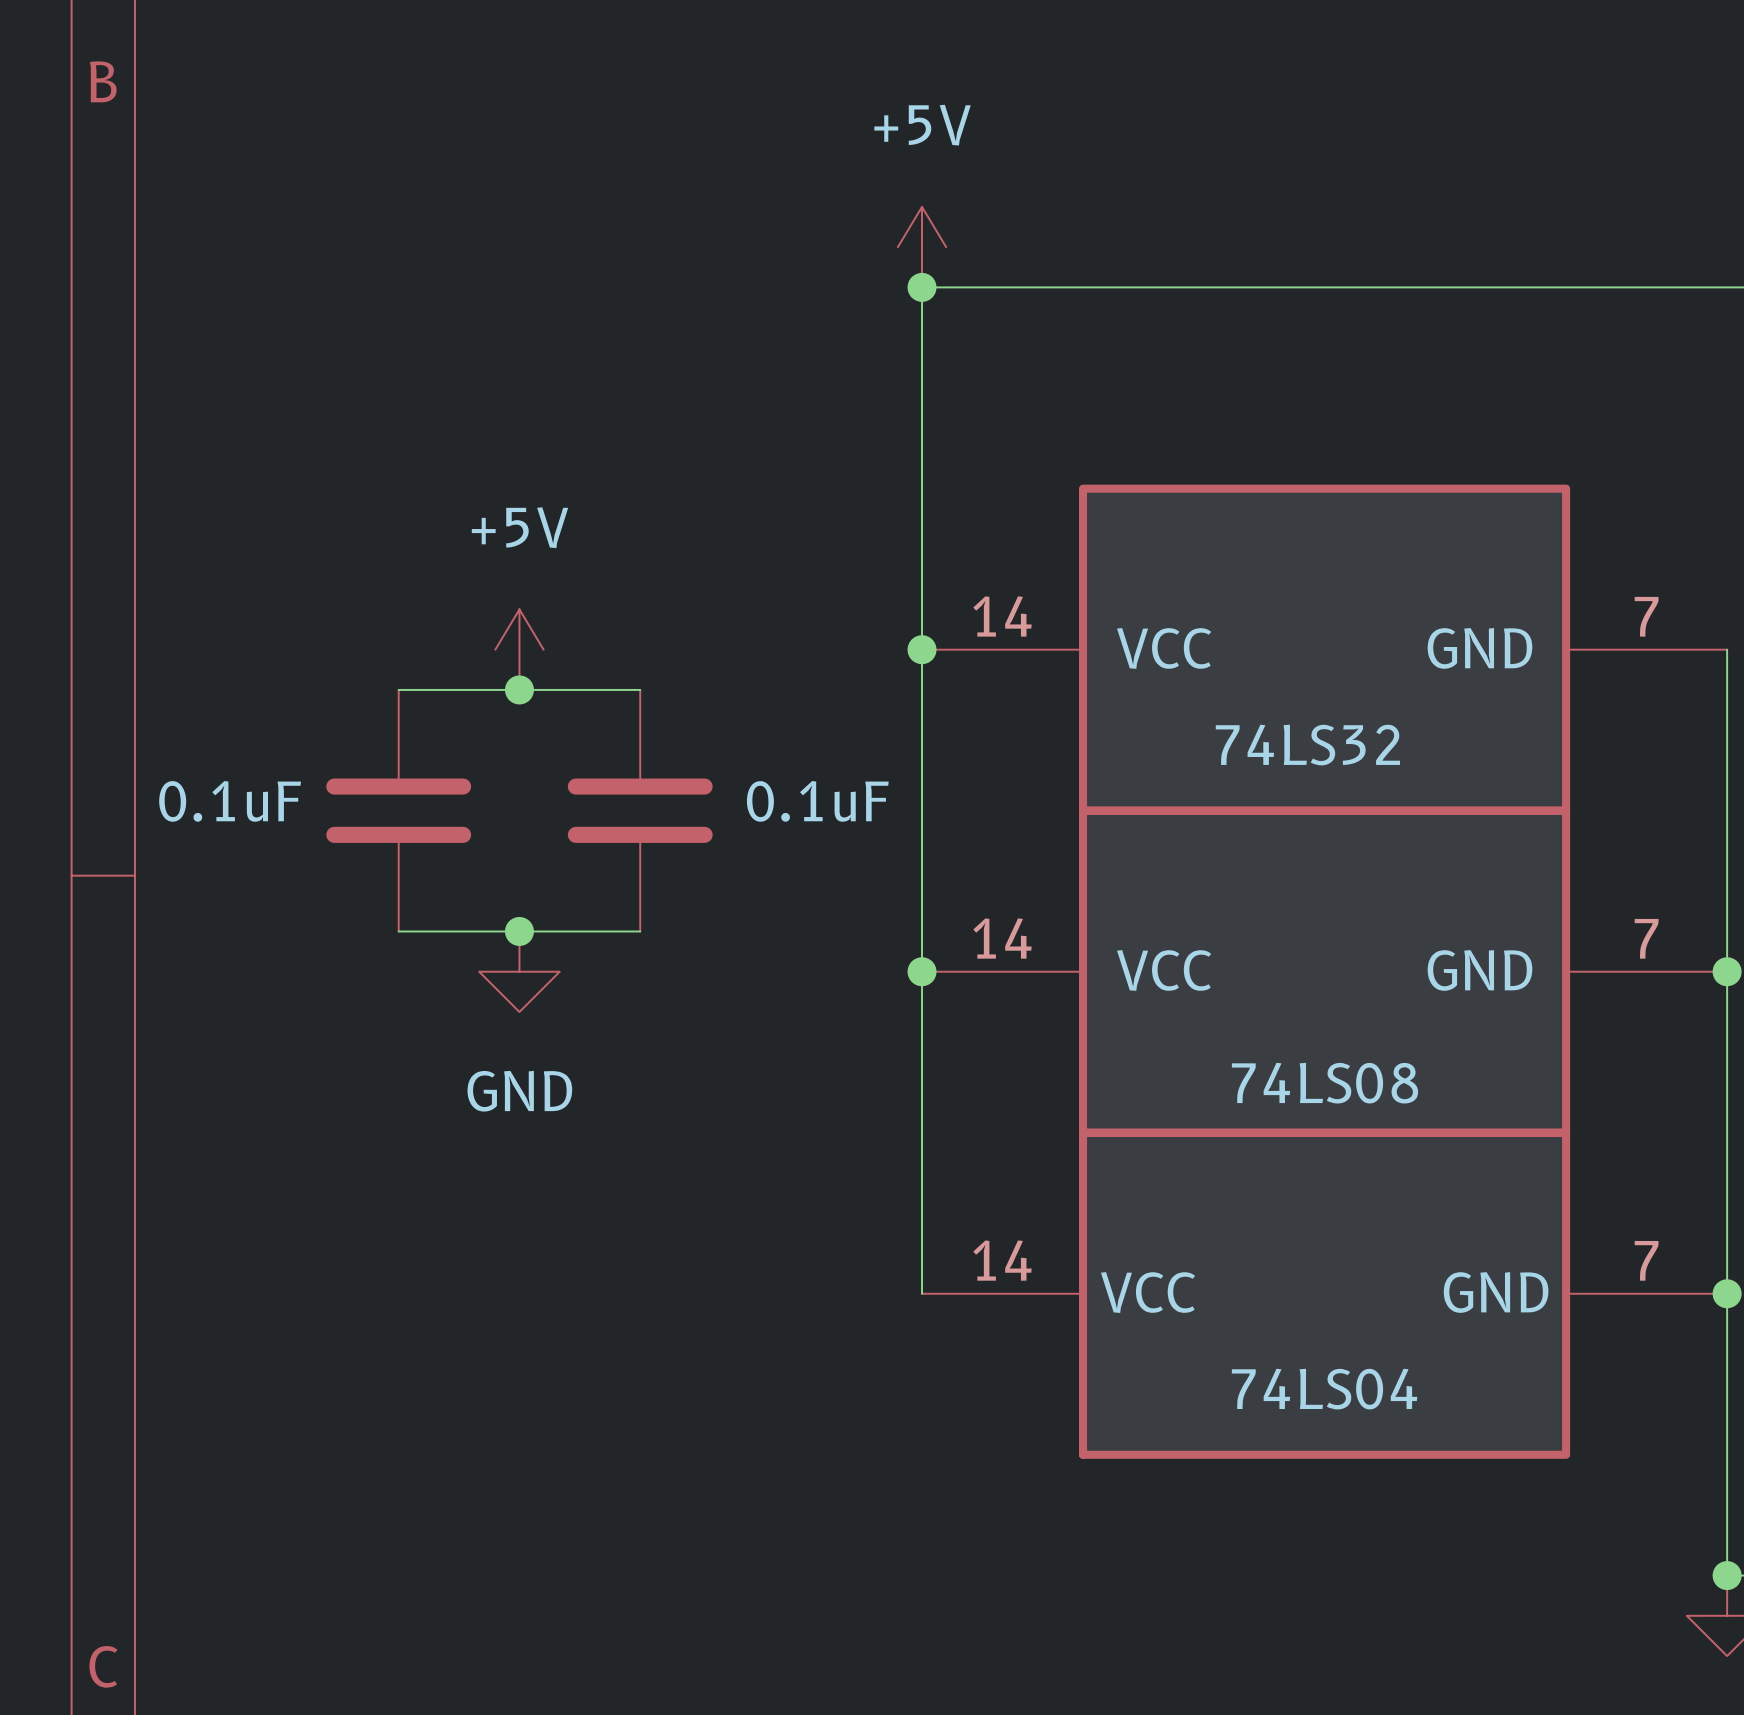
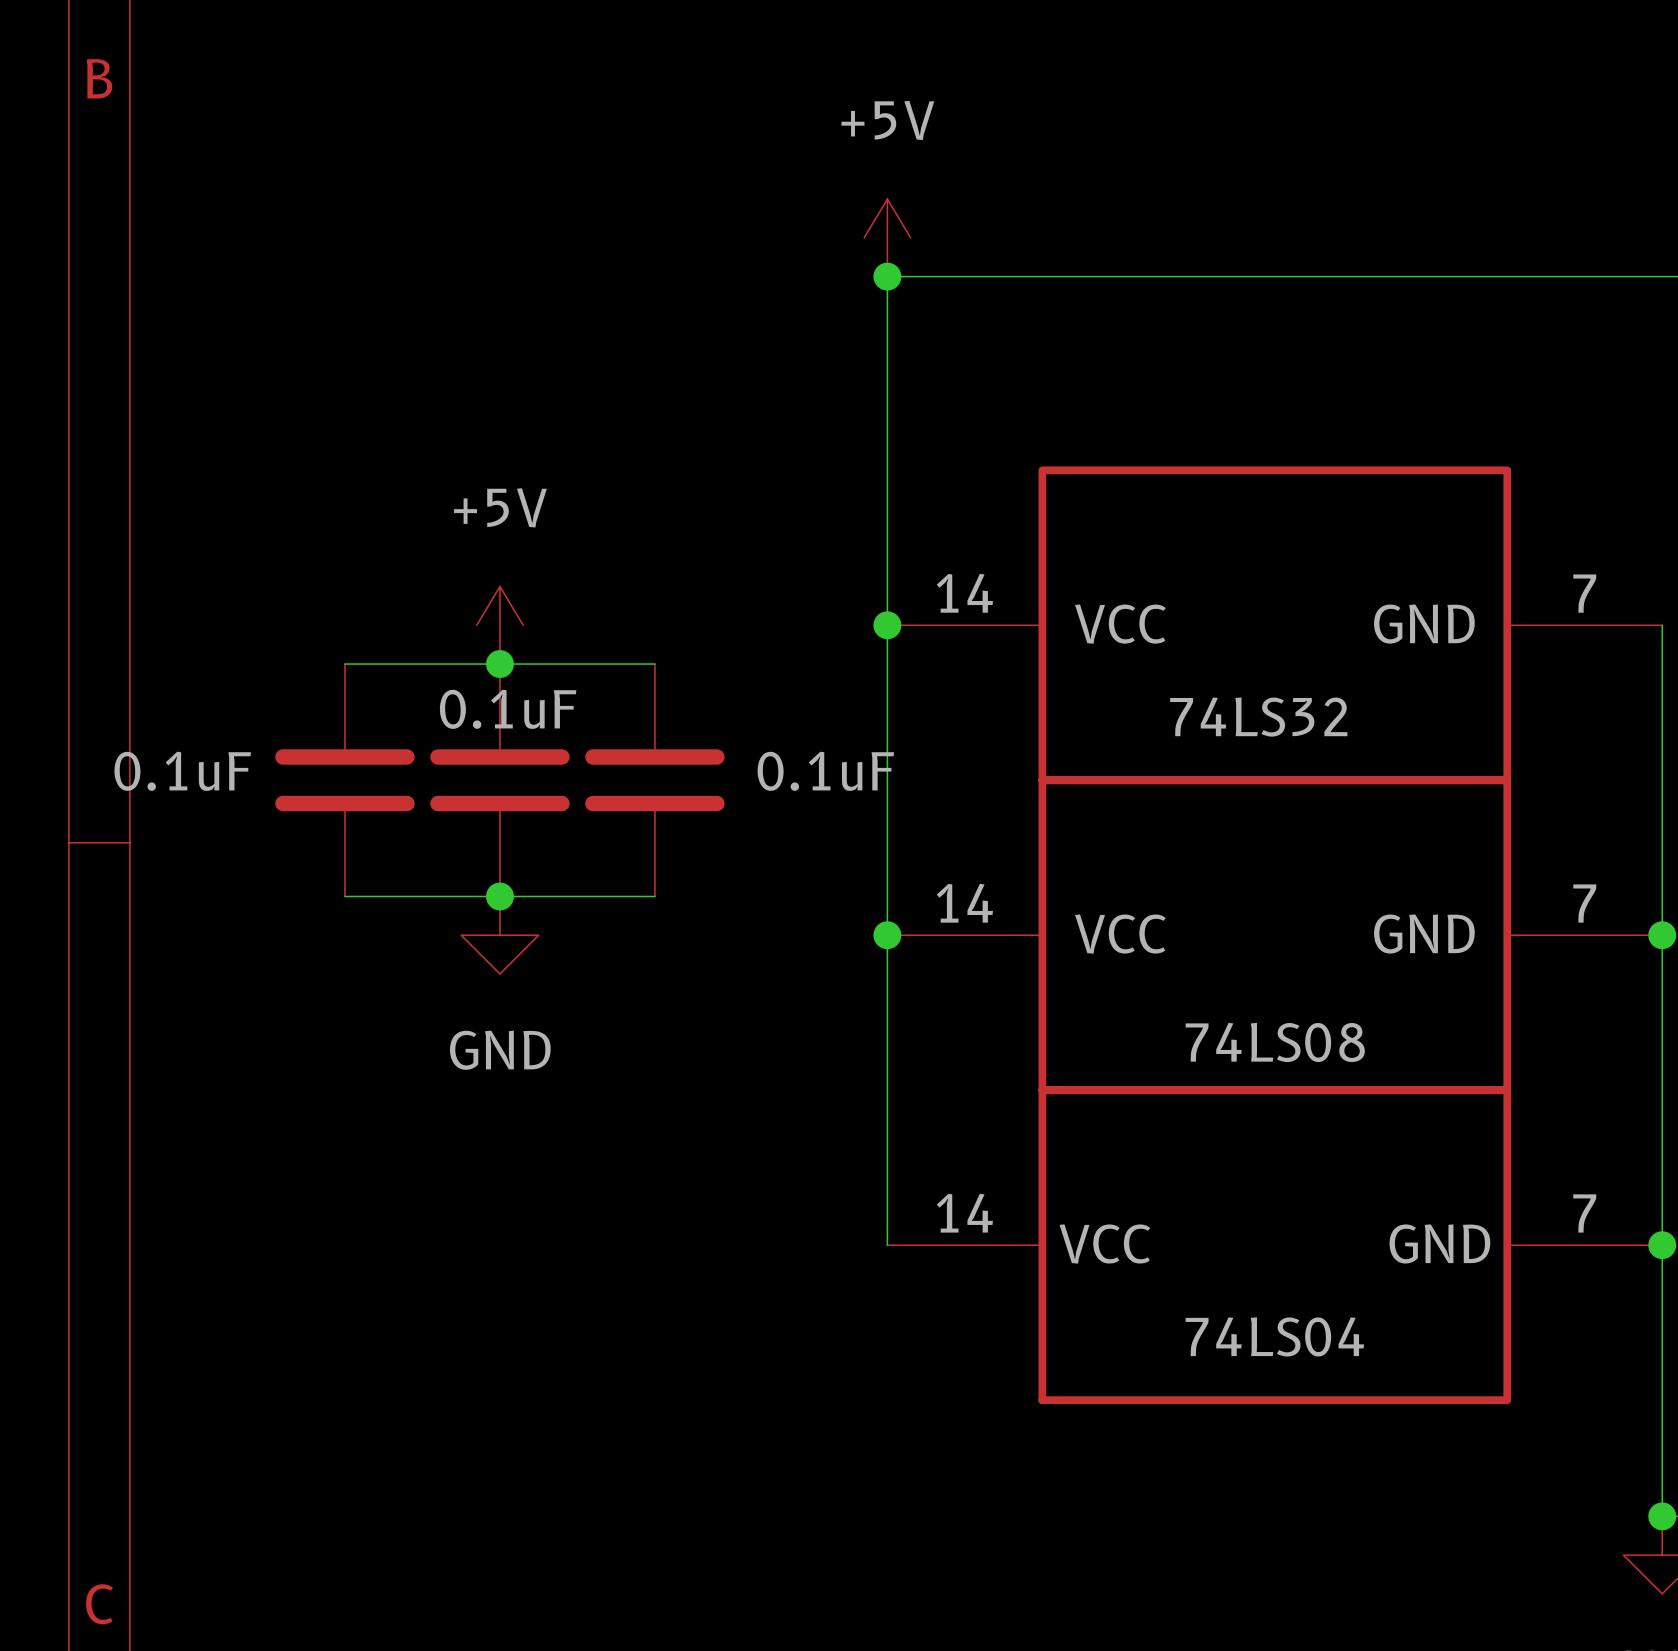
wire: none -> (344, 664) (383, 664)
wire: none -> (616, 664) (654, 664)
part position: (398, 810) -> (344, 780)
part: none -> 0.1uF (499, 780)
part position: (640, 810) -> (654, 780)
wire: none -> (344, 896) (383, 896)
wire: none -> (616, 896) (654, 896)

